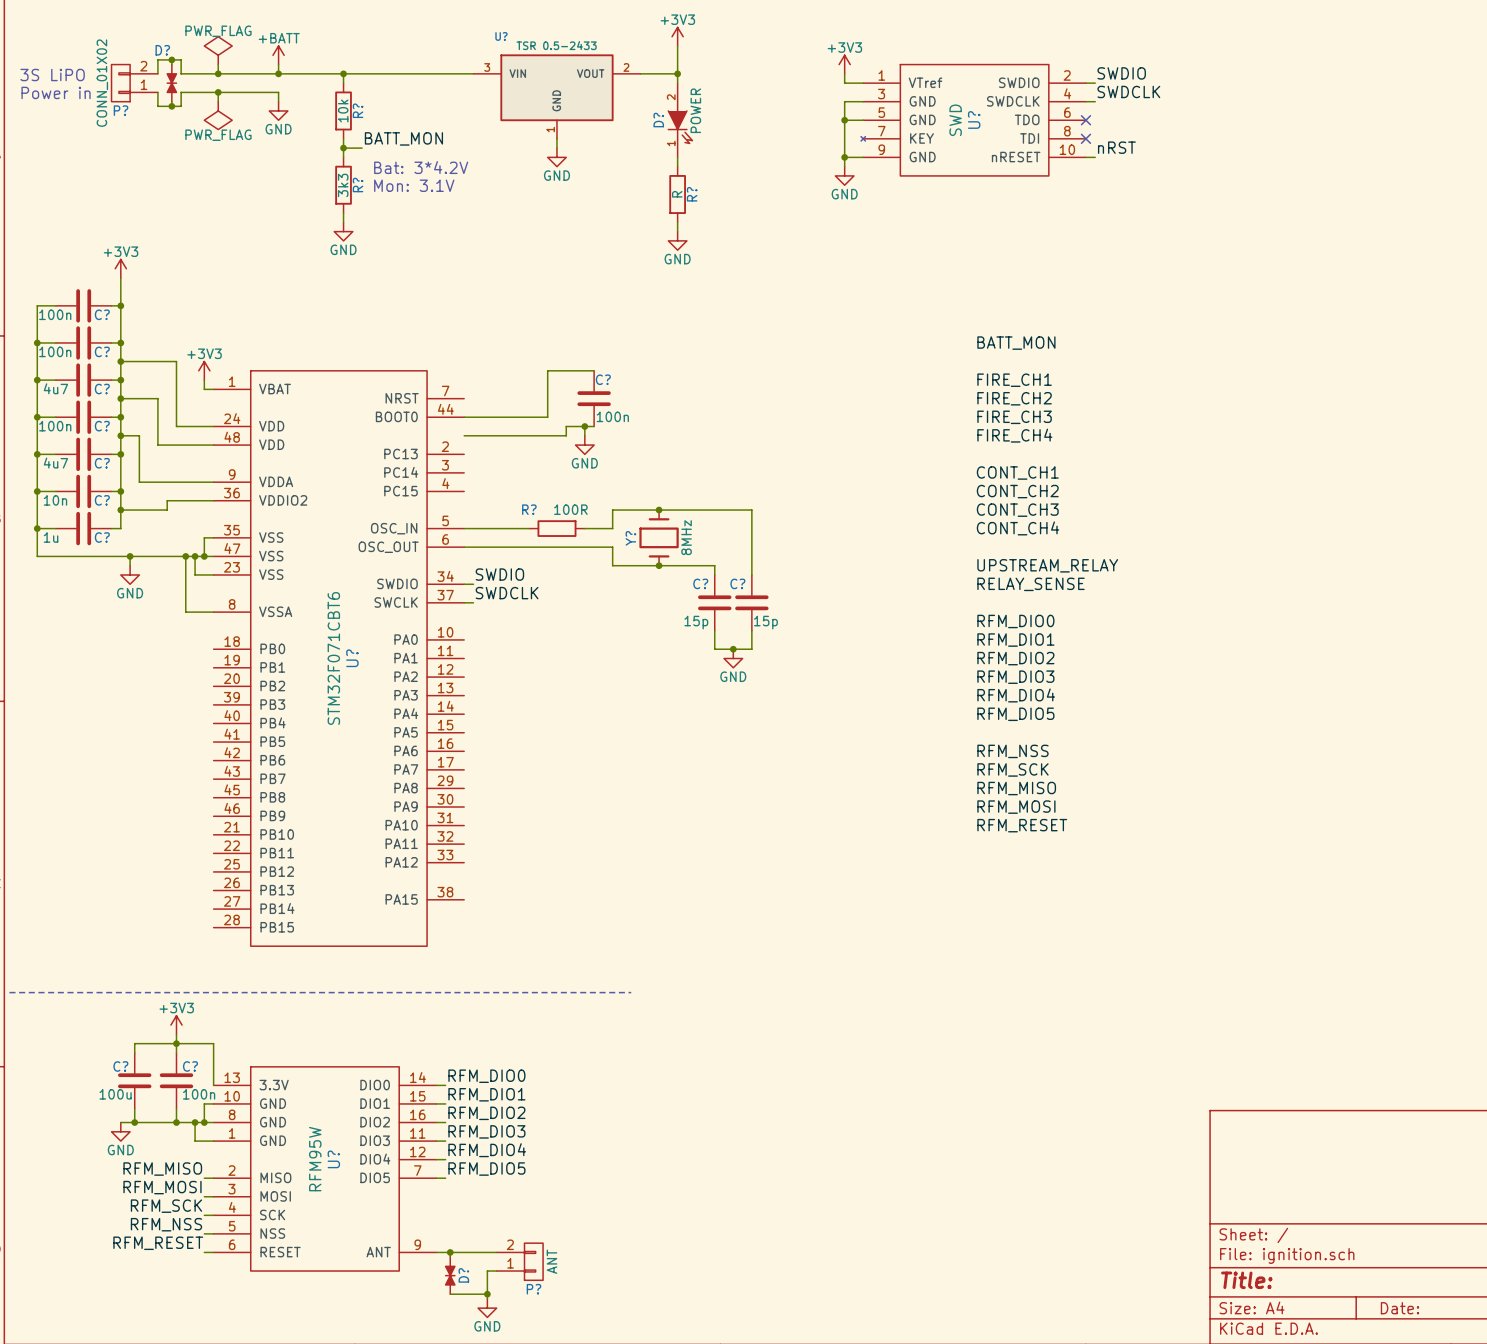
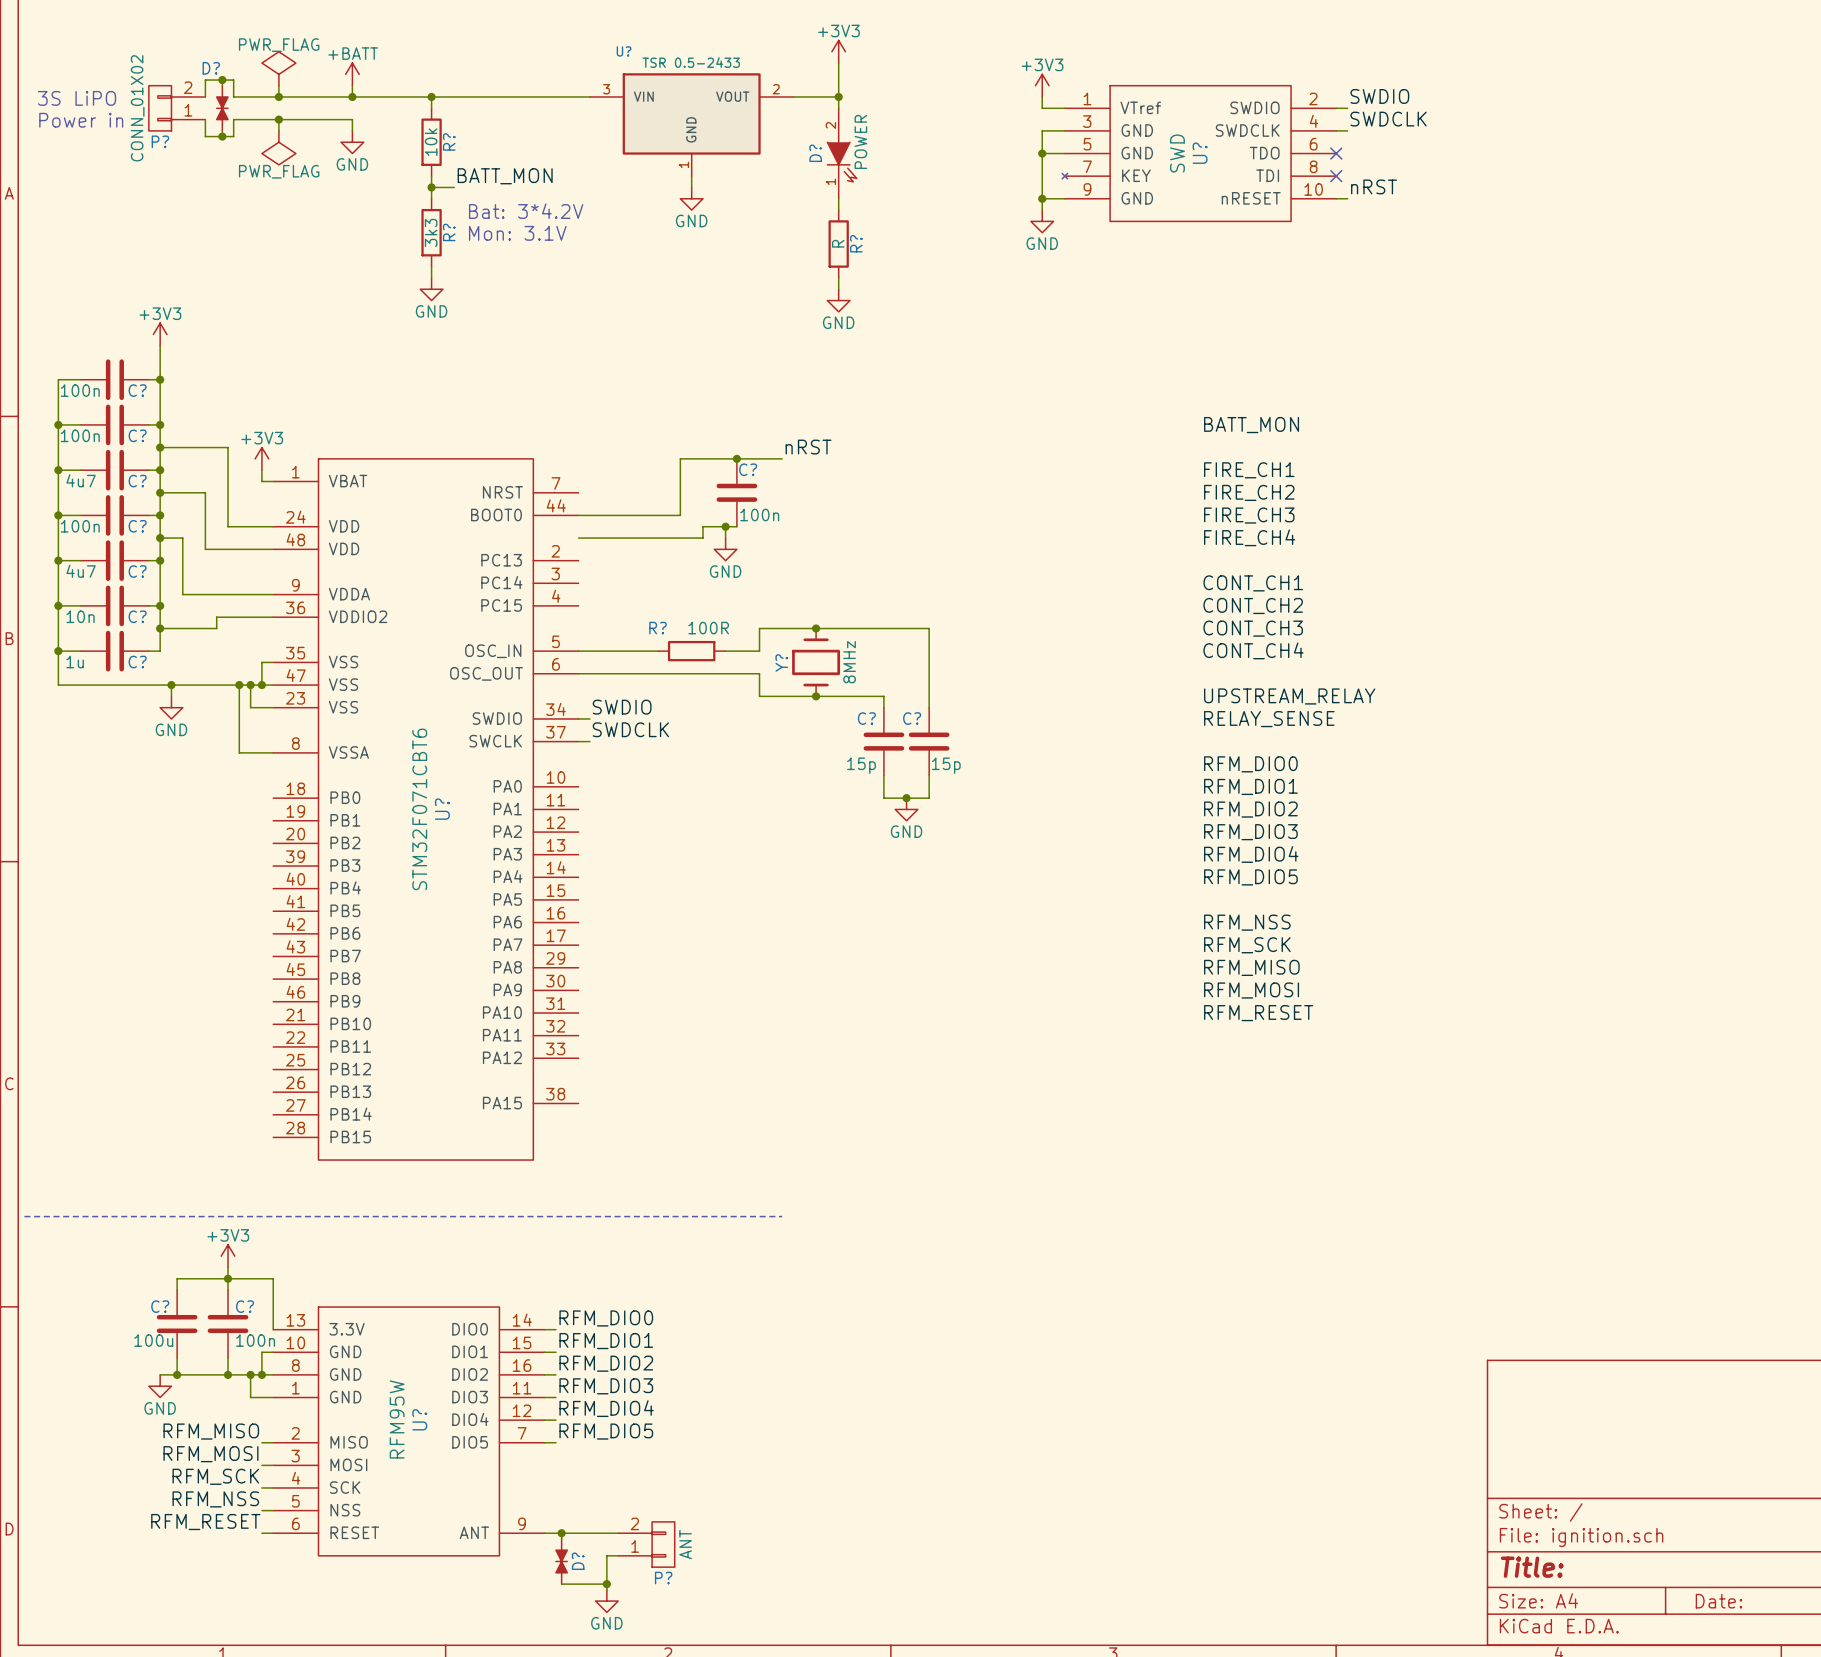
label: none -> nRST (808, 447)
wire: none -> (736, 458) (782, 458)
junction: none -> (736, 458)

